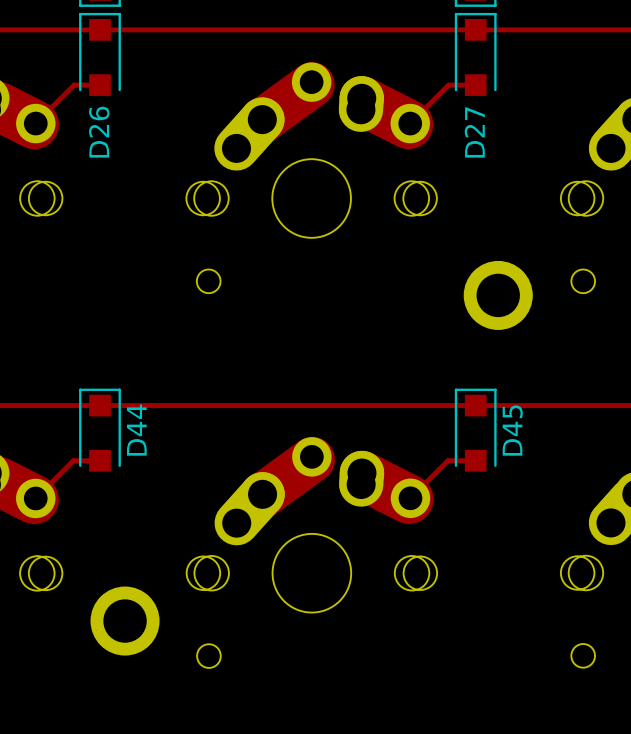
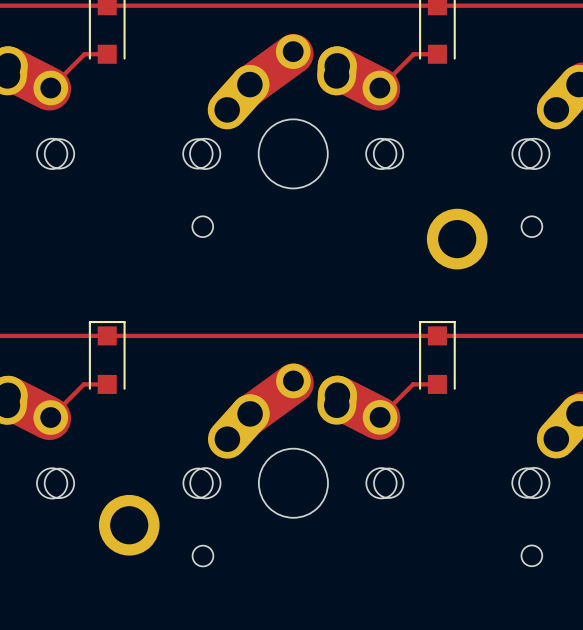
D26 name: D26 (99, 132) -> none
D27 name: D27 (474, 132) -> none
D44 name: D44 (136, 430) -> none
D45 name: D45 (512, 430) -> none

